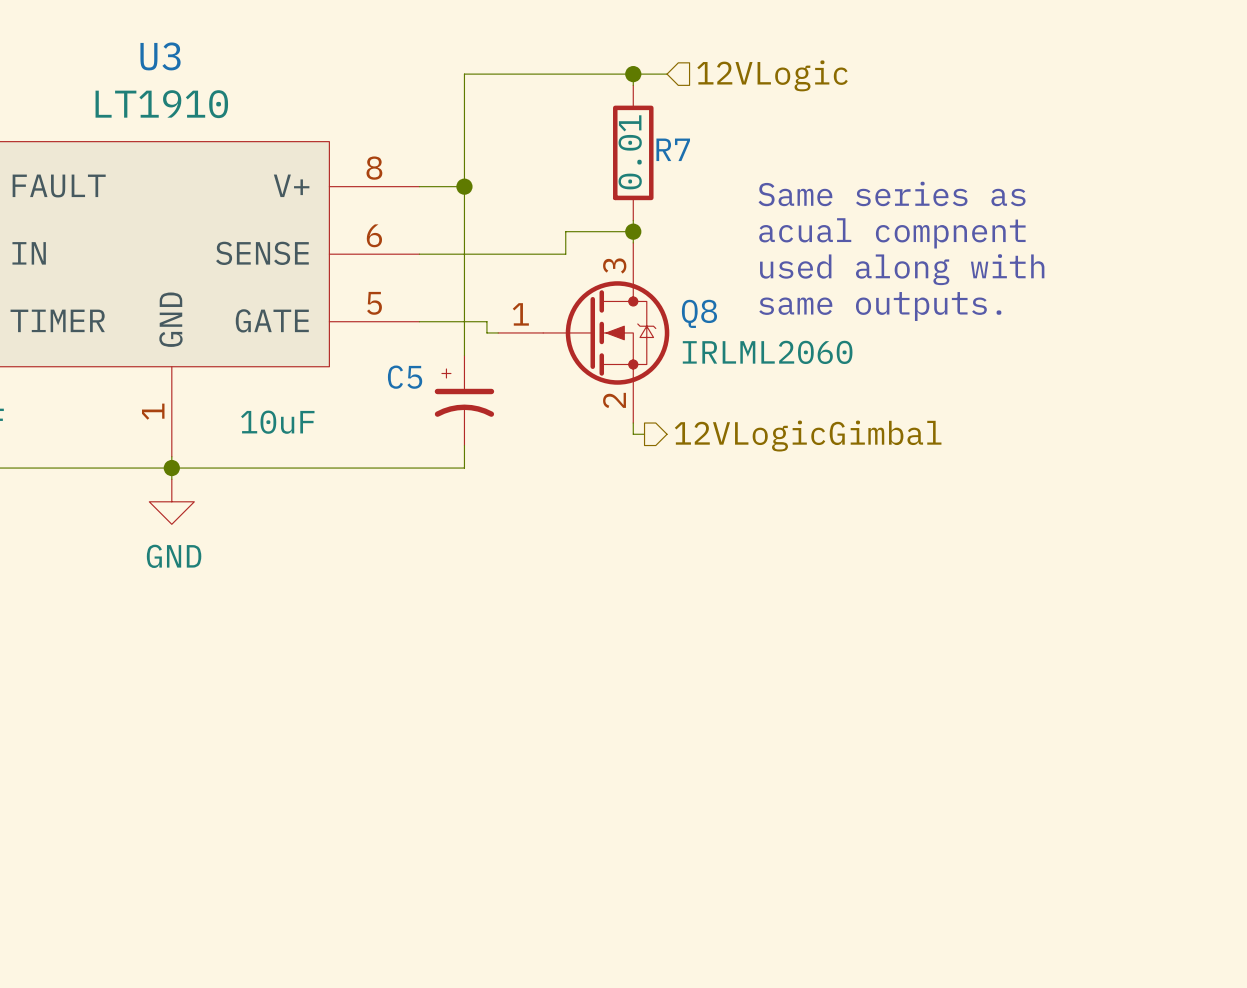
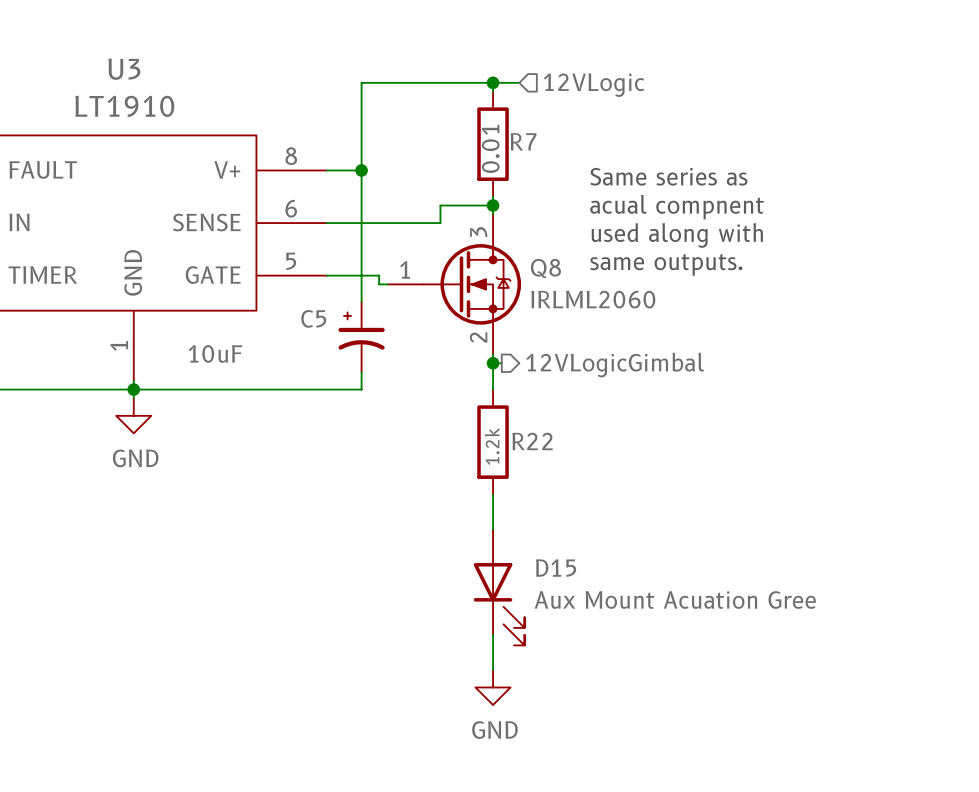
wire: none -> (493, 363) (493, 389)
junction: none -> (493, 363)
R22: none -> 1.2k (493, 442)
wire: none -> (493, 494) (493, 529)
D15: none -> Aux Mount Acuation Gree (499, 587)
wire: none -> (493, 634) (493, 669)
power symbol: none -> GND (493, 687)

